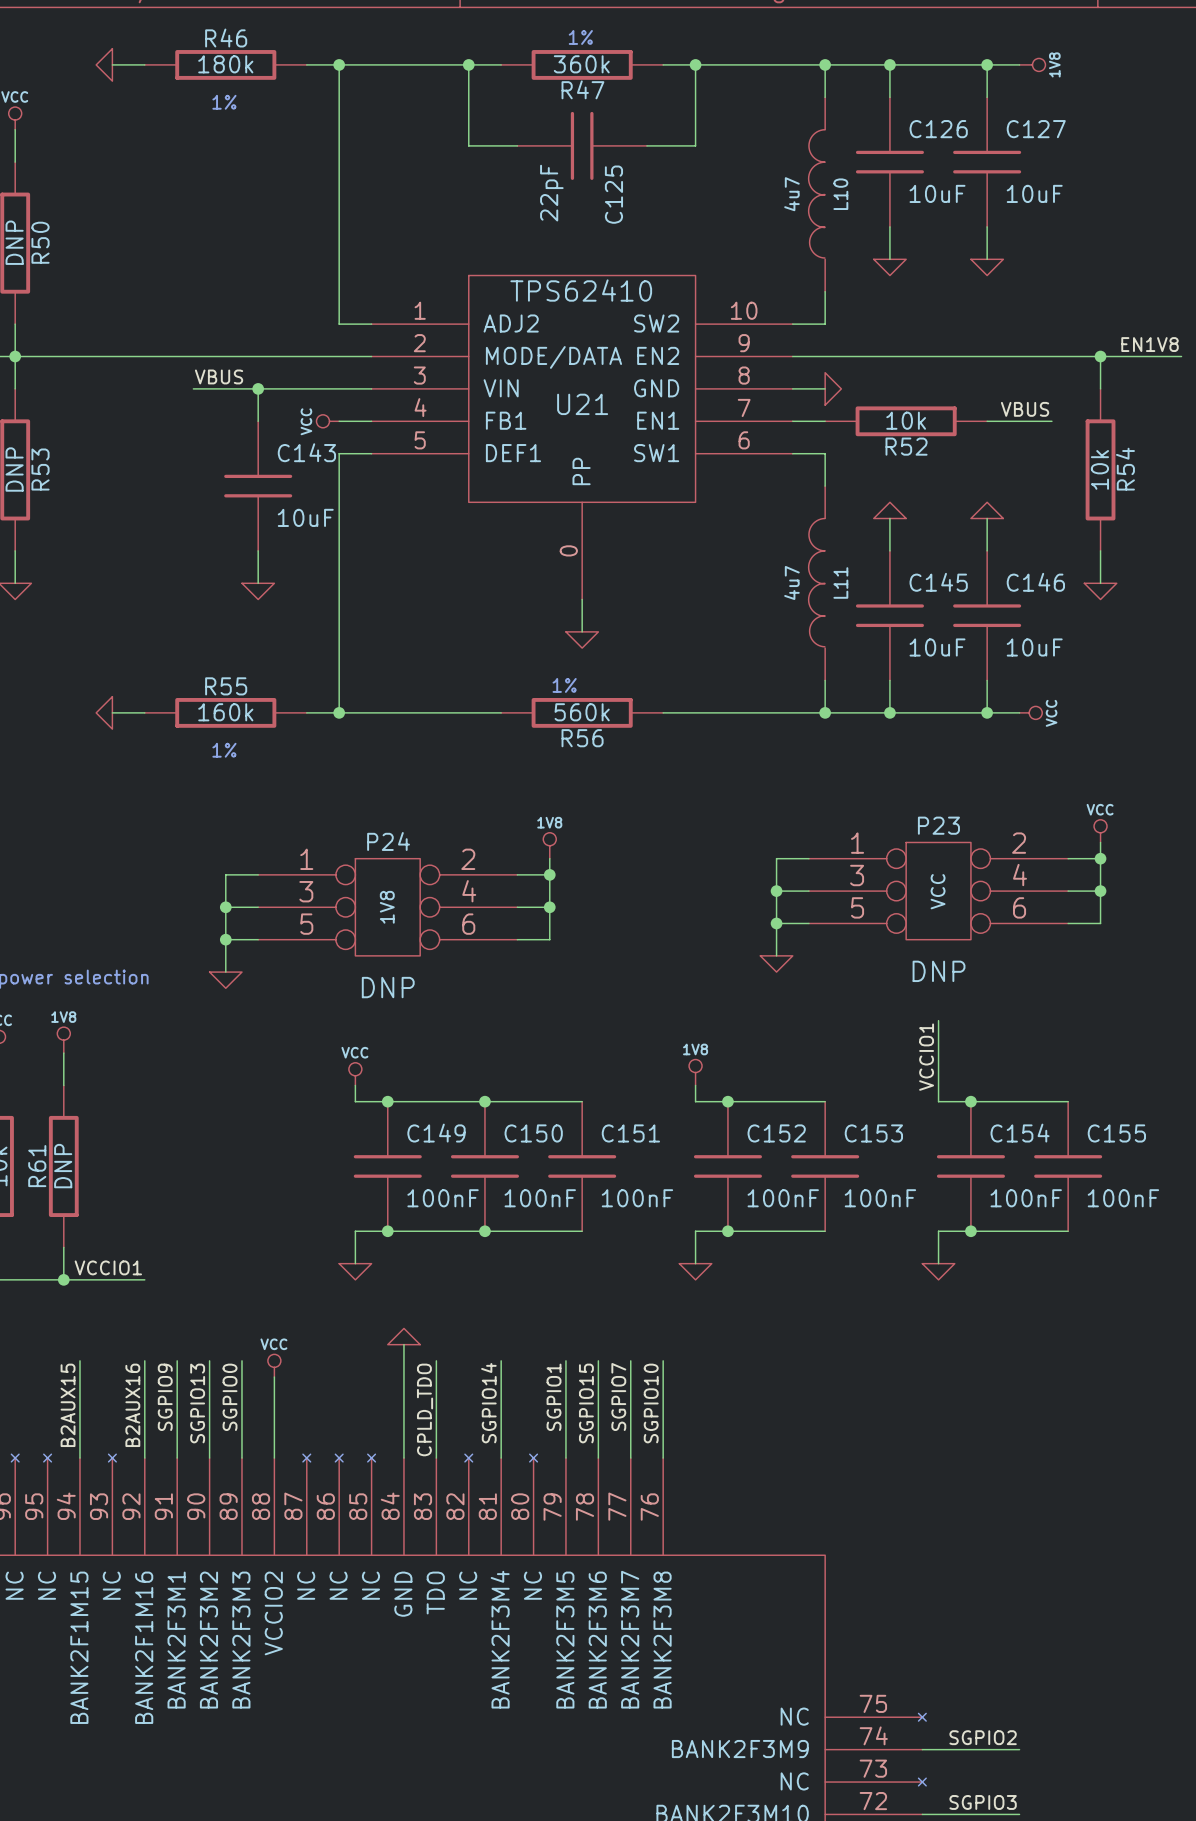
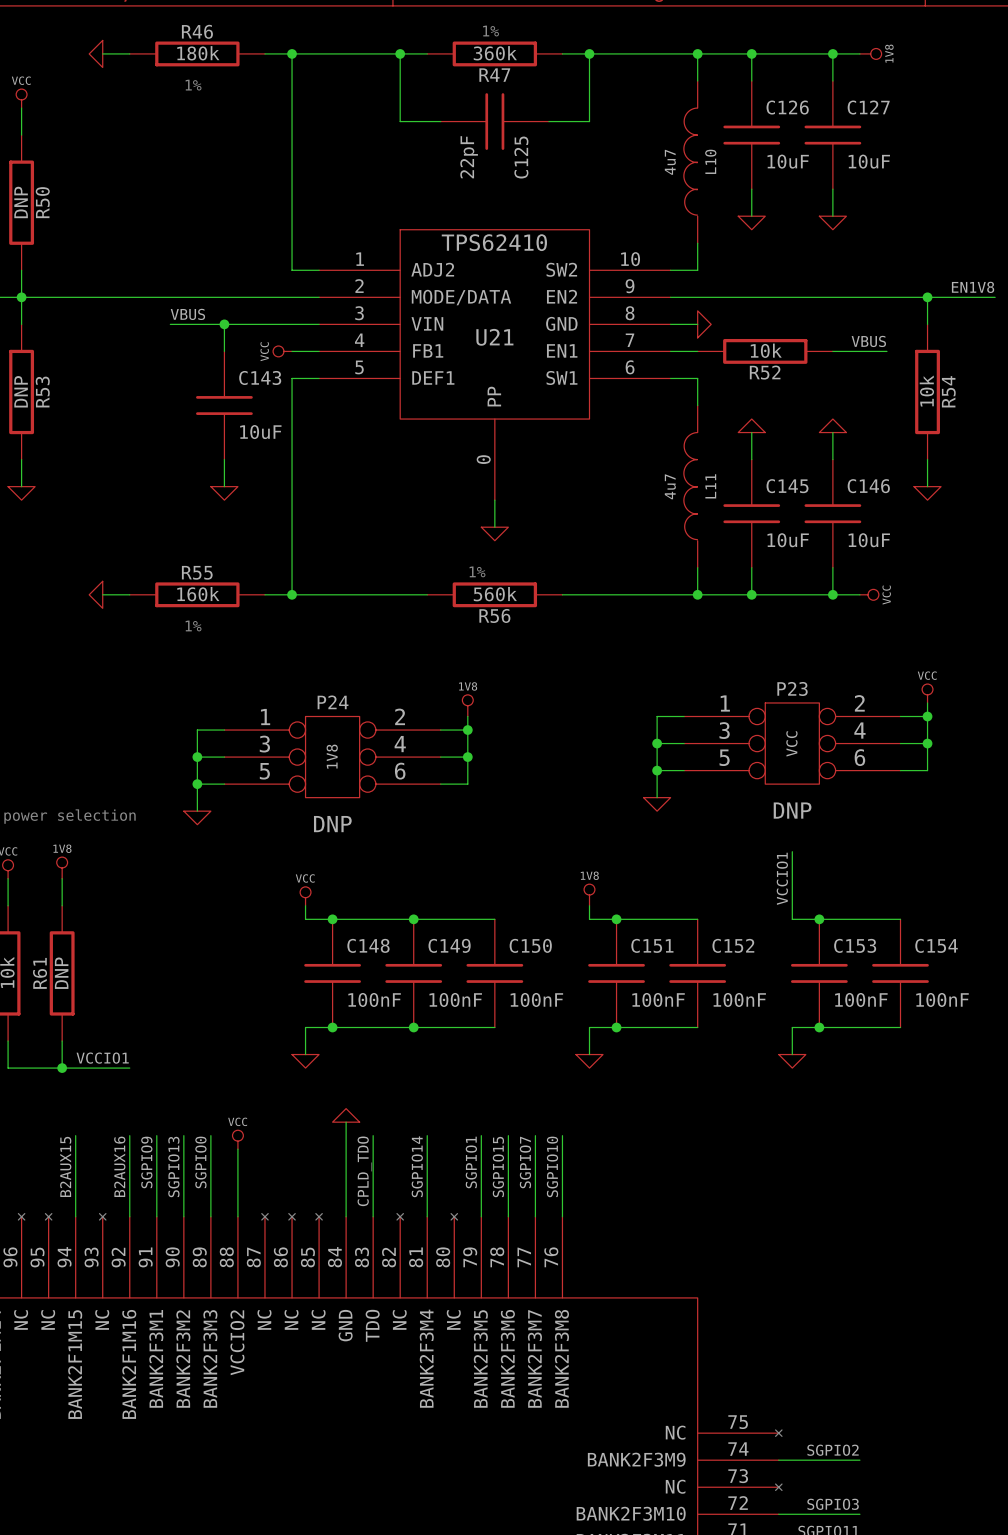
C149 name: C149 (436, 1133) -> C148 (368, 945)
C150 name: C150 (533, 1133) -> C149 (449, 945)
C151 name: C151 (630, 1133) -> C150 (530, 945)
C152 name: C152 (776, 1133) -> C151 (652, 945)
C153 name: C153 (873, 1133) -> C152 (733, 945)
C154 name: C154 (1020, 1133) -> C153 (855, 945)
C155 name: C155 (1116, 1133) -> C154 (936, 945)

